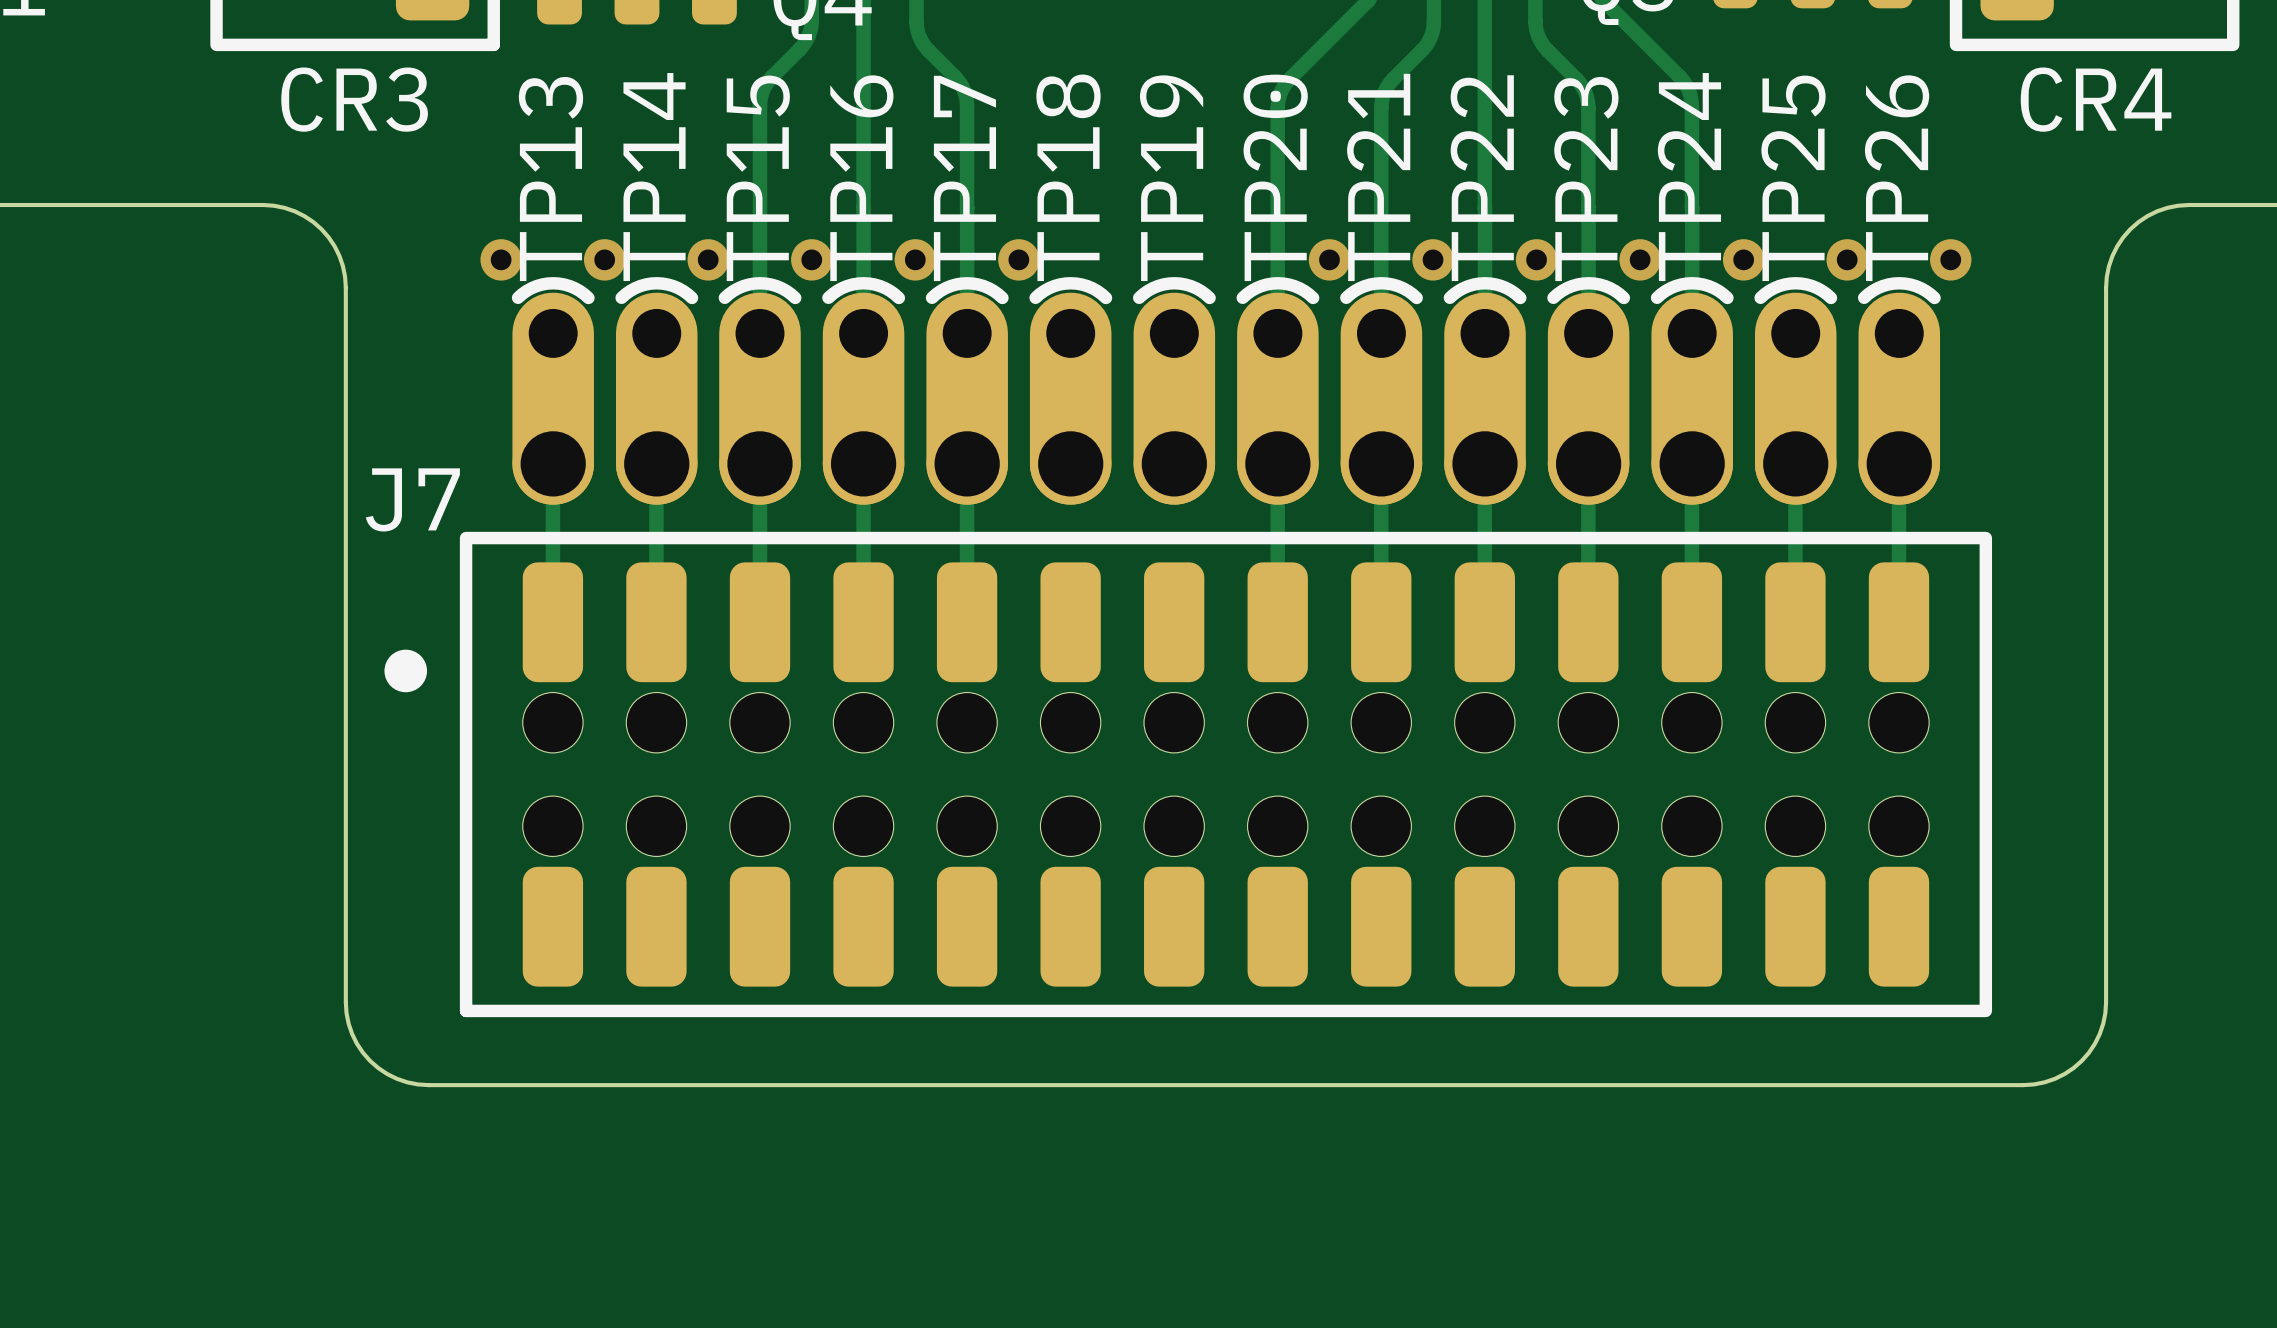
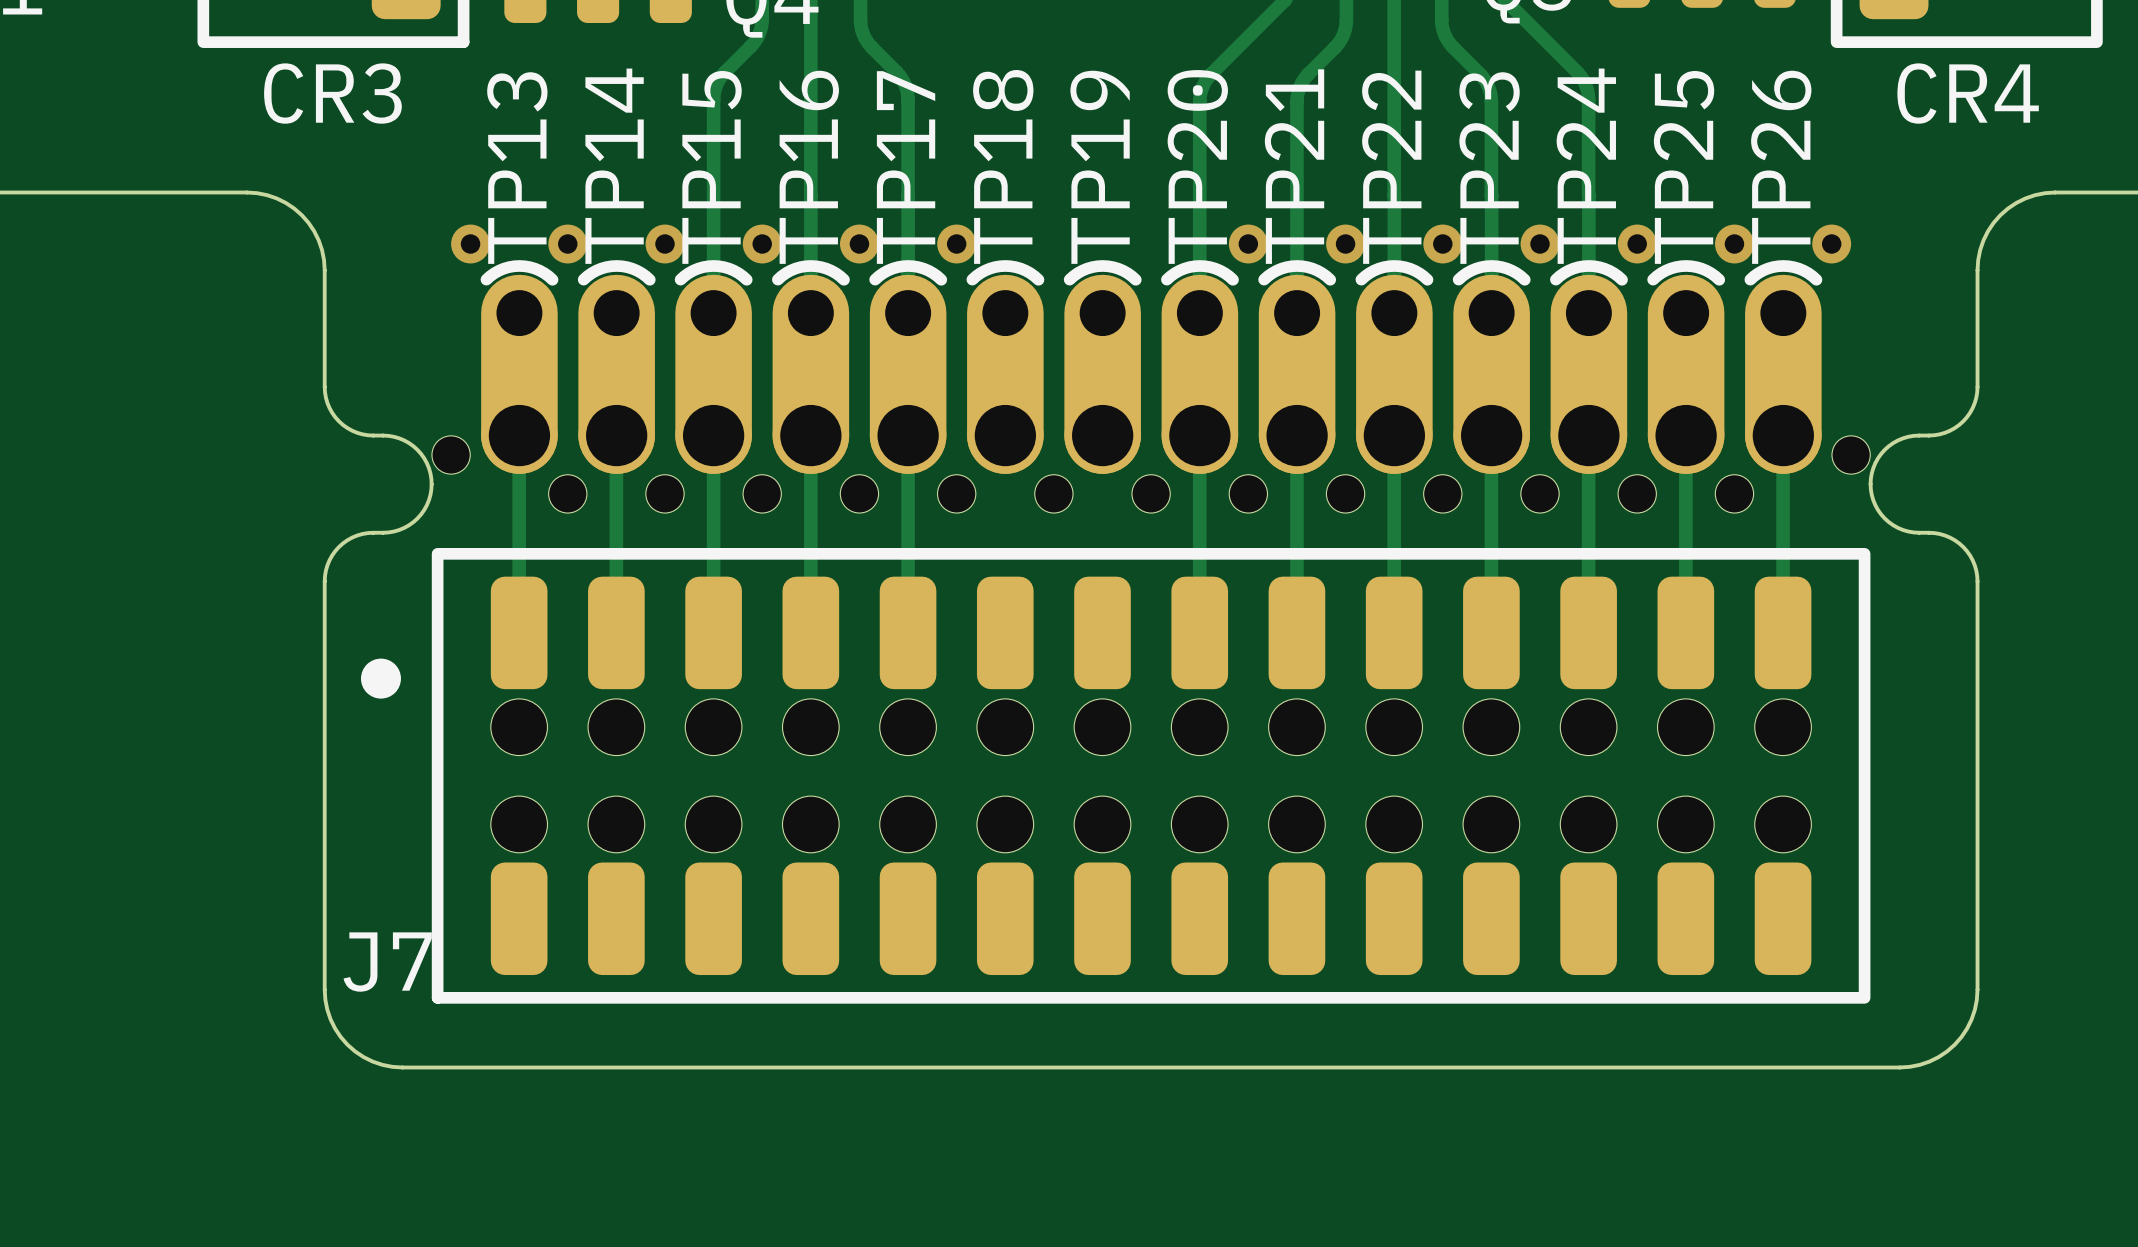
board edge: (345, 412) (345, 619) -> (324, 386) (327, 402) (332, 412) (347, 428) (362, 434) (399, 438) (417, 449) (428, 468) (431, 484) (430, 494) (424, 510) (408, 525) (393, 531) (357, 535) (338, 547) (327, 565) (324, 581)
board edge: (2106, 412) (2106, 619) -> (1977, 386) (1972, 408) (1963, 421) (1944, 432) (1908, 436) (1893, 443) (1878, 458) (1873, 468) (1870, 484) (1873, 500) (1878, 510) (1893, 525) (1908, 531) (1944, 535) (1963, 547) (1972, 560) (1977, 581)
J7 name position: J7 (412, 499) -> J7 (387, 962)
part: none -> (1151, 474)
J7 position: (1188, 774) -> (1115, 775)
board edge: (345, 1002) (352, 1033) (370, 1060) (396, 1078) (428, 1085) (2023, 1085) (2054, 1078) (2081, 1060) (2099, 1033) (2106, 1002) -> (324, 941) (325, 999) (335, 1028) (347, 1044) (363, 1057) (382, 1064) (402, 1067) (1909, 1066) (1929, 1061) (1947, 1051) (1967, 1028) (1976, 999) (1977, 941)

